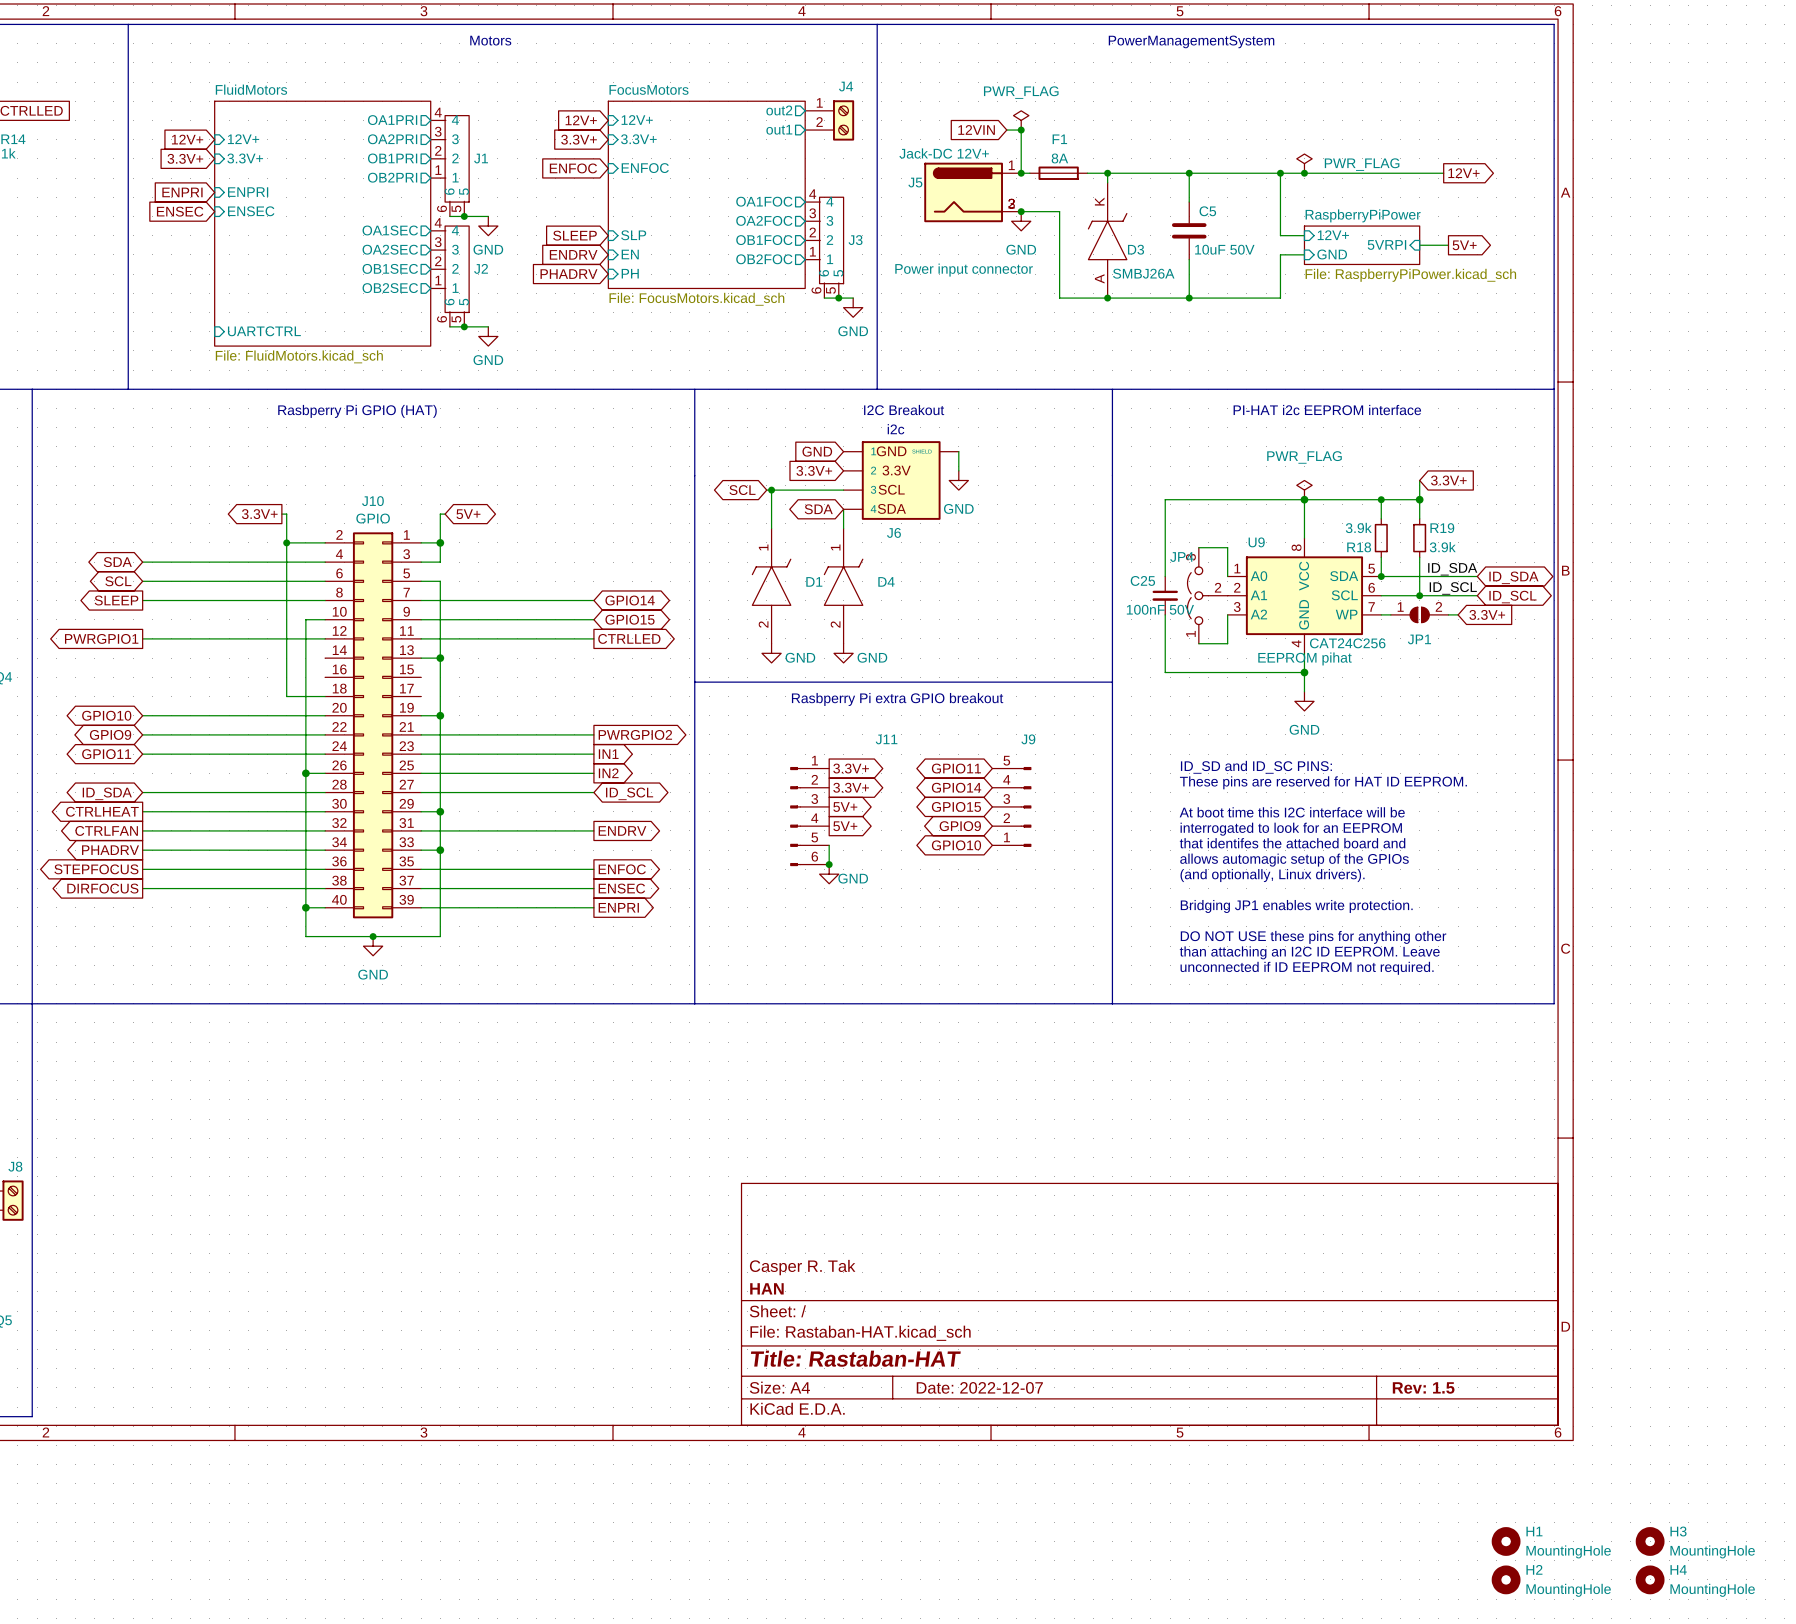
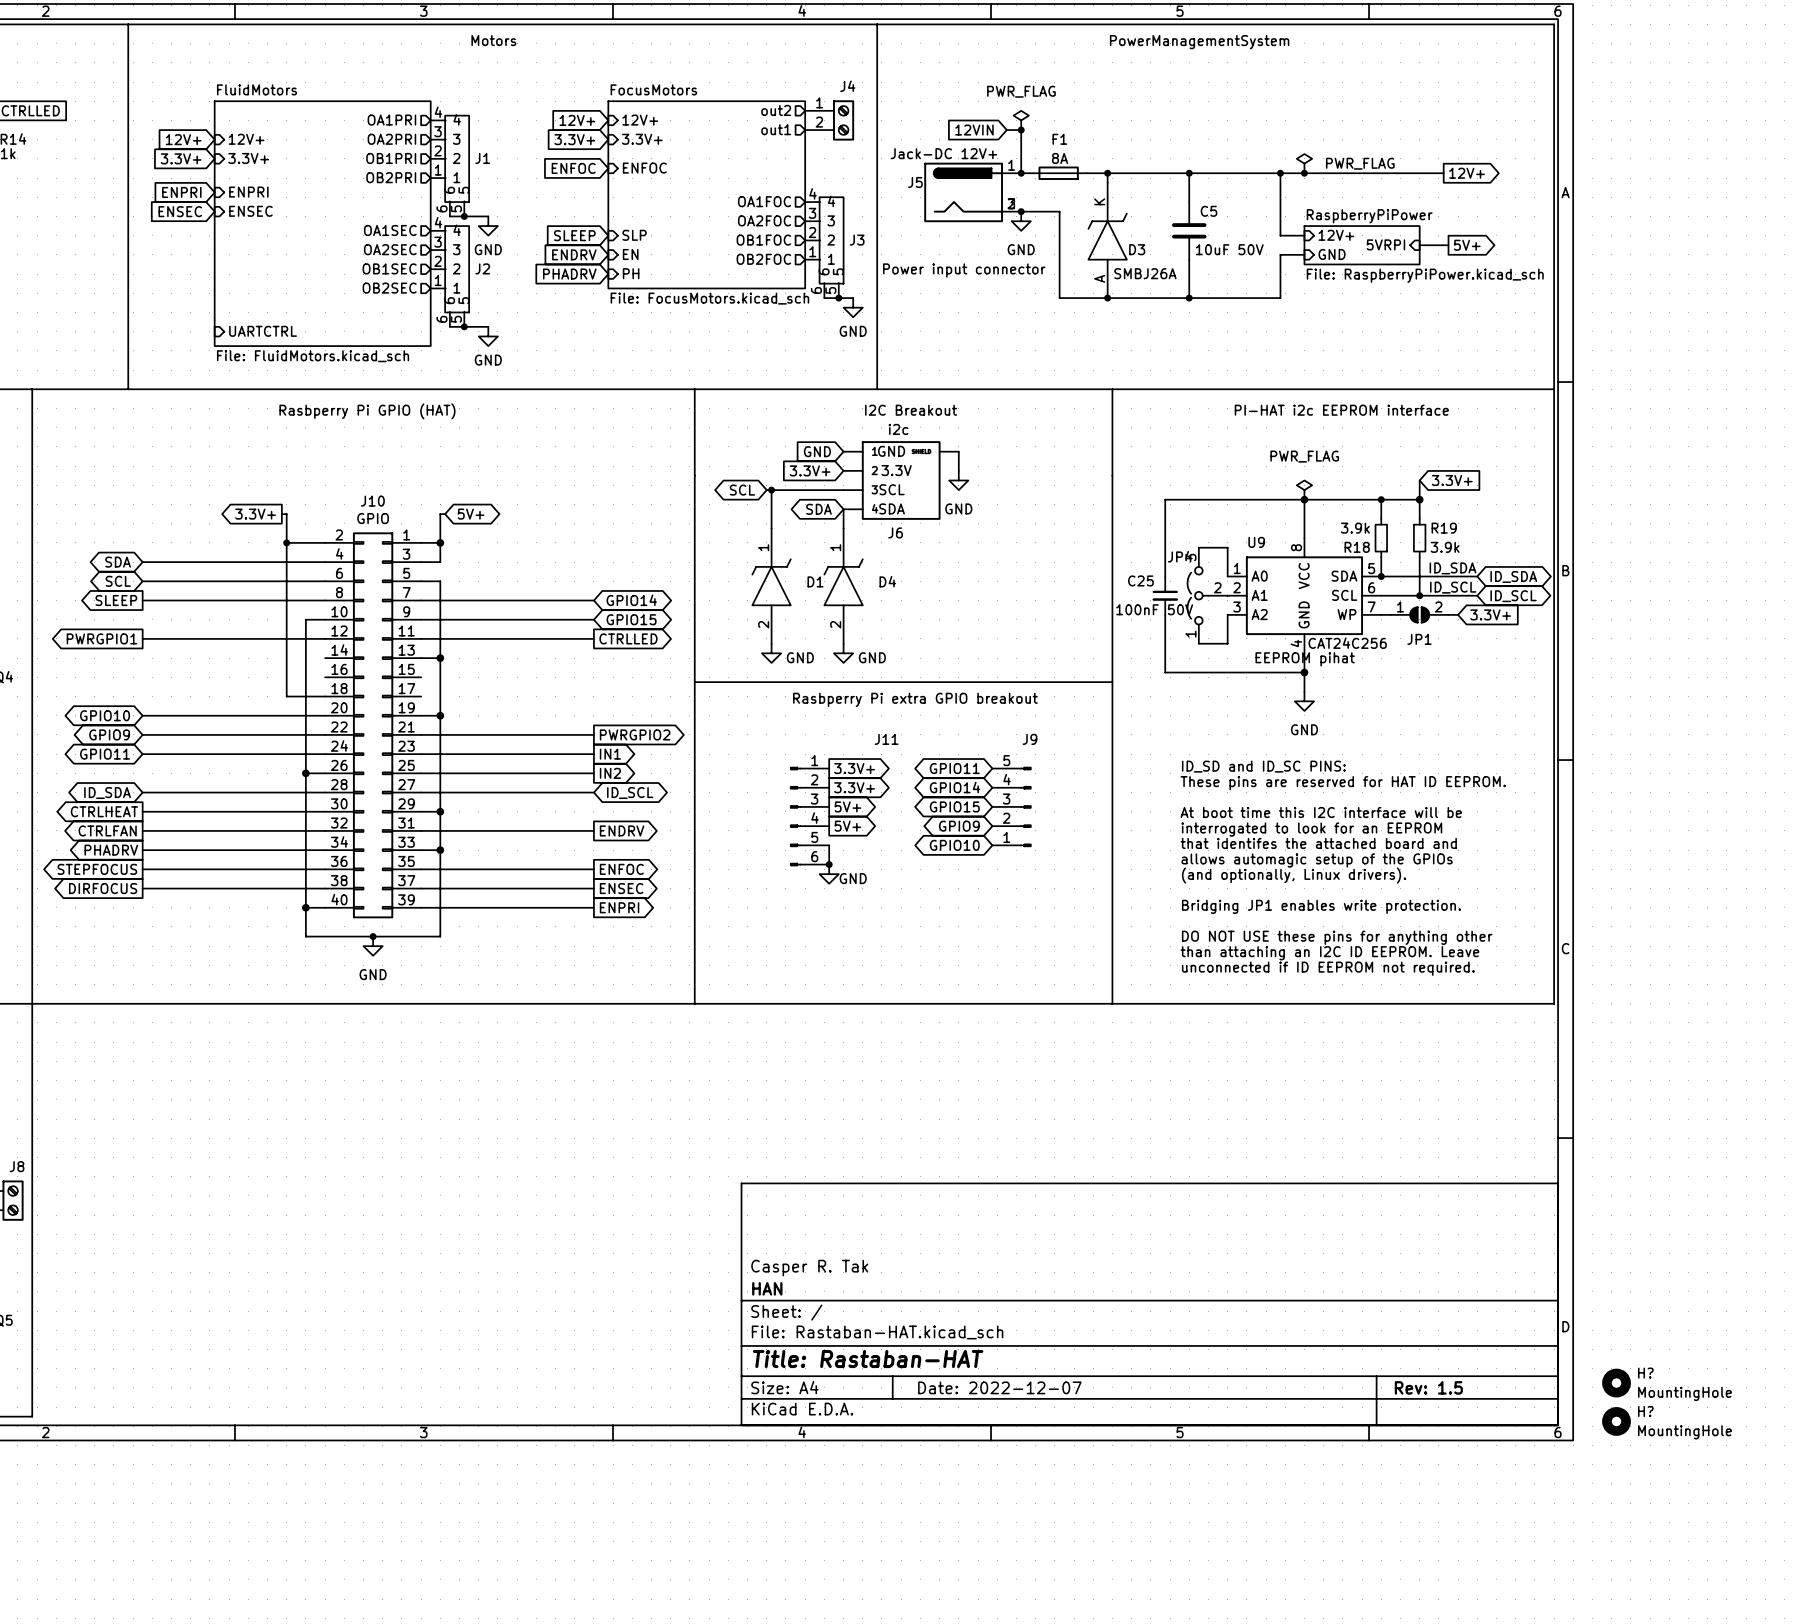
H?: none -> MountingHole (1616, 1383)
H?: none -> MountingHole (1616, 1421)
H1: MountingHole (1506, 1541) -> none
H3: MountingHole (1650, 1541) -> none
H2: MountingHole (1506, 1579) -> none
H4: MountingHole (1650, 1579) -> none

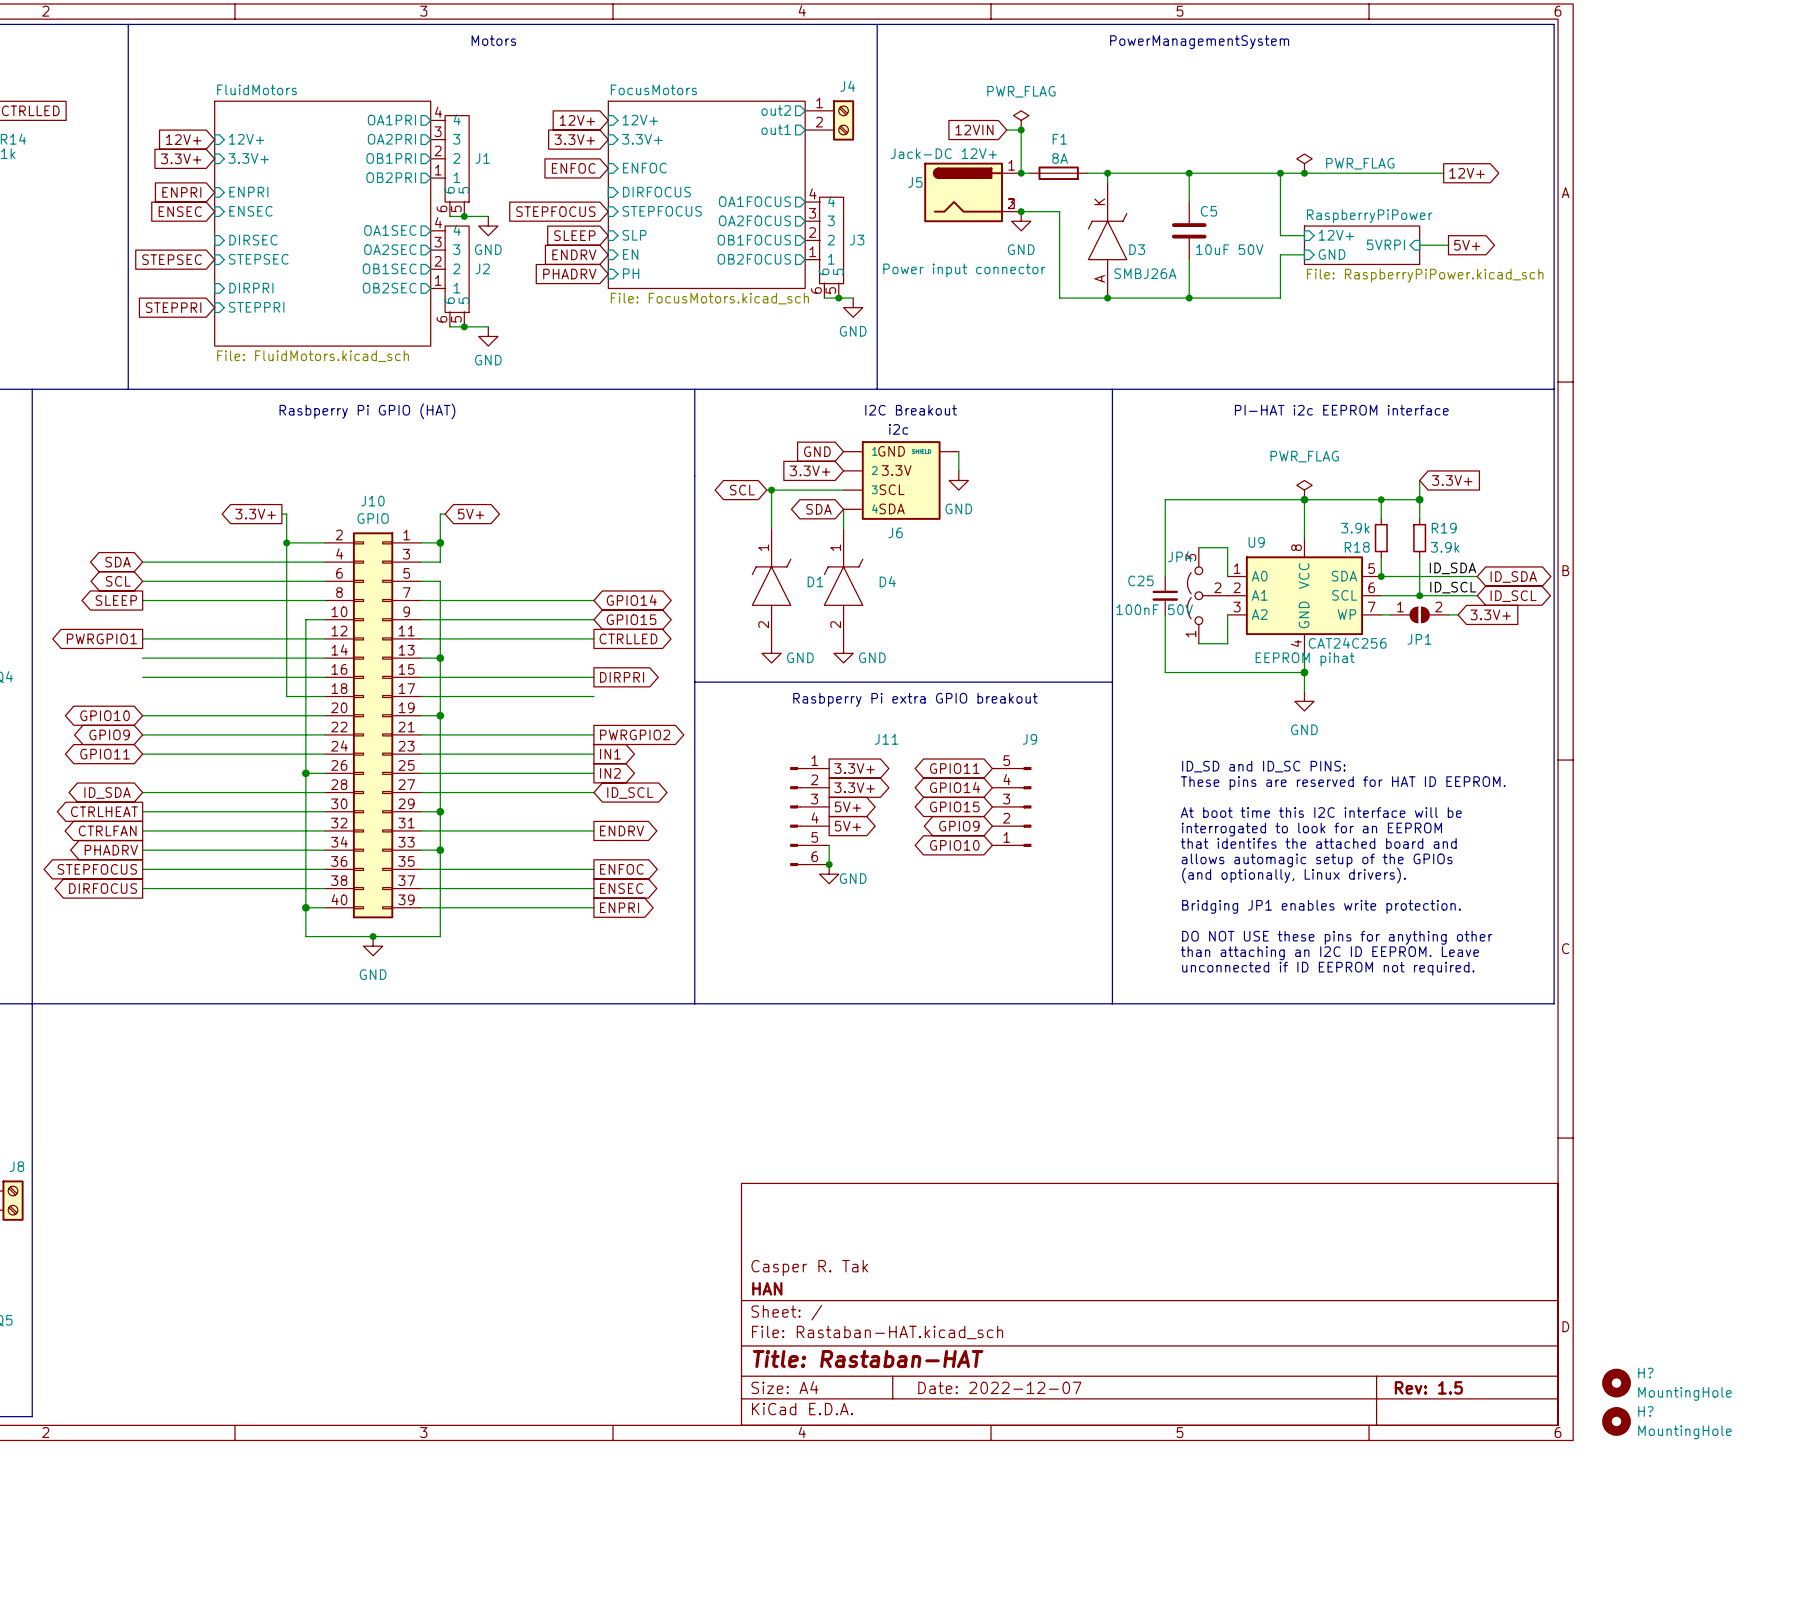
sheet pin: none -> DIRFOCUS (656, 192)
sheet pin: OA1FOC (764, 201) -> OA1FOCUS (754, 201)
global label: none -> STEPFOCUS (555, 211)
sheet pin: none -> STEPFOCUS (662, 211)
sheet pin: OA2FOC (764, 220) -> OA2FOCUS (754, 220)
sheet pin: none -> DIRSEC (253, 240)
sheet pin: OB1FOC (763, 240) -> OB1FOCUS (754, 240)
global label: none -> STEPSEC (172, 259)
sheet pin: none -> STEPSEC (258, 259)
sheet pin: OB2FOC (763, 259) -> OB2FOCUS (754, 259)
sheet pin: none -> DIRPRI (251, 288)
global label: none -> STEPPRI (173, 307)
sheet pin: none -> STEPPRI (256, 307)
sheet pin: UARTCTRL (263, 331) -> none
wire: none -> (142, 658) (325, 658)
wire: none -> (142, 677) (325, 677)
wire: none -> (421, 677) (593, 677)
global label: none -> DIRPRI (622, 677)
wire: none -> (421, 696) (593, 696)

